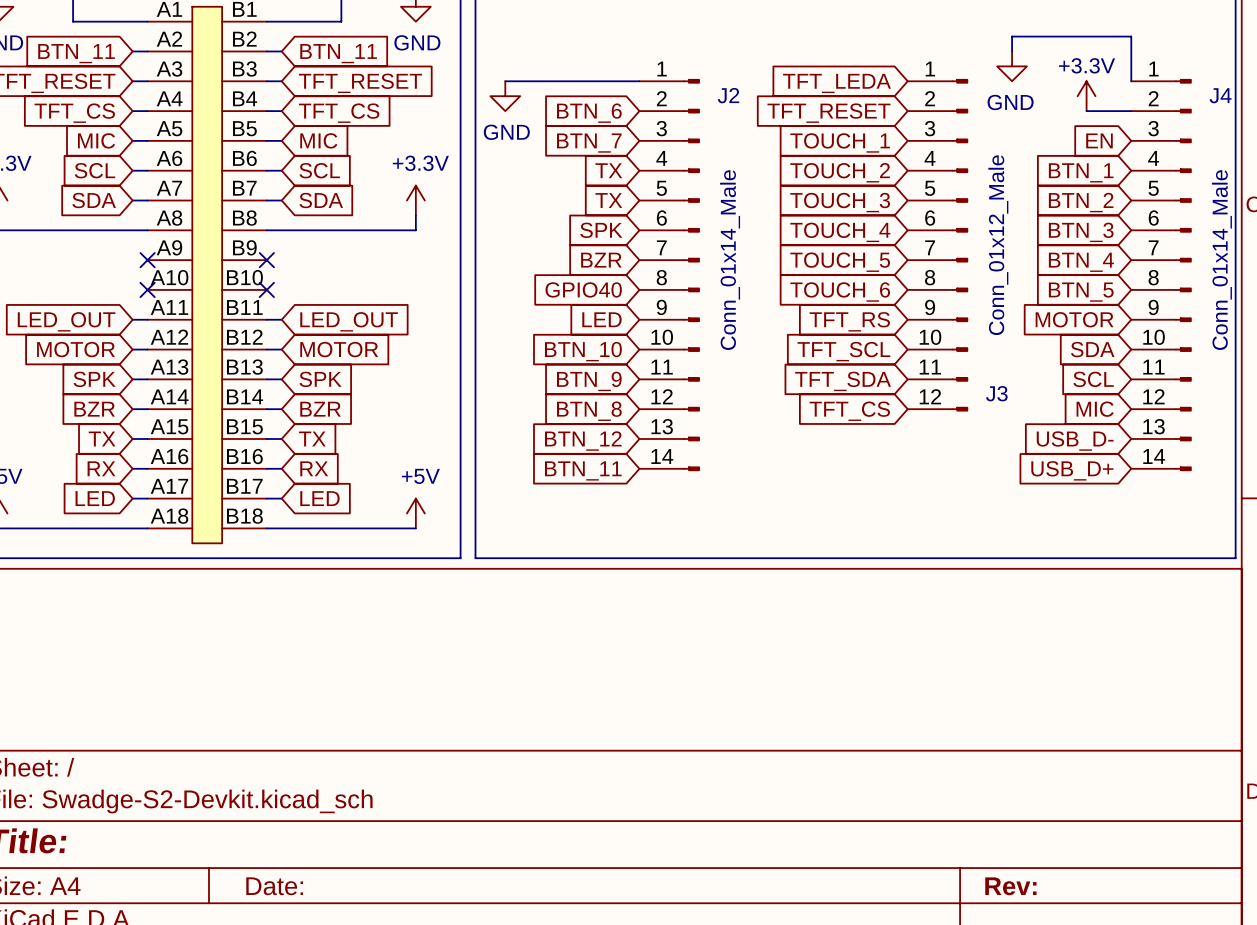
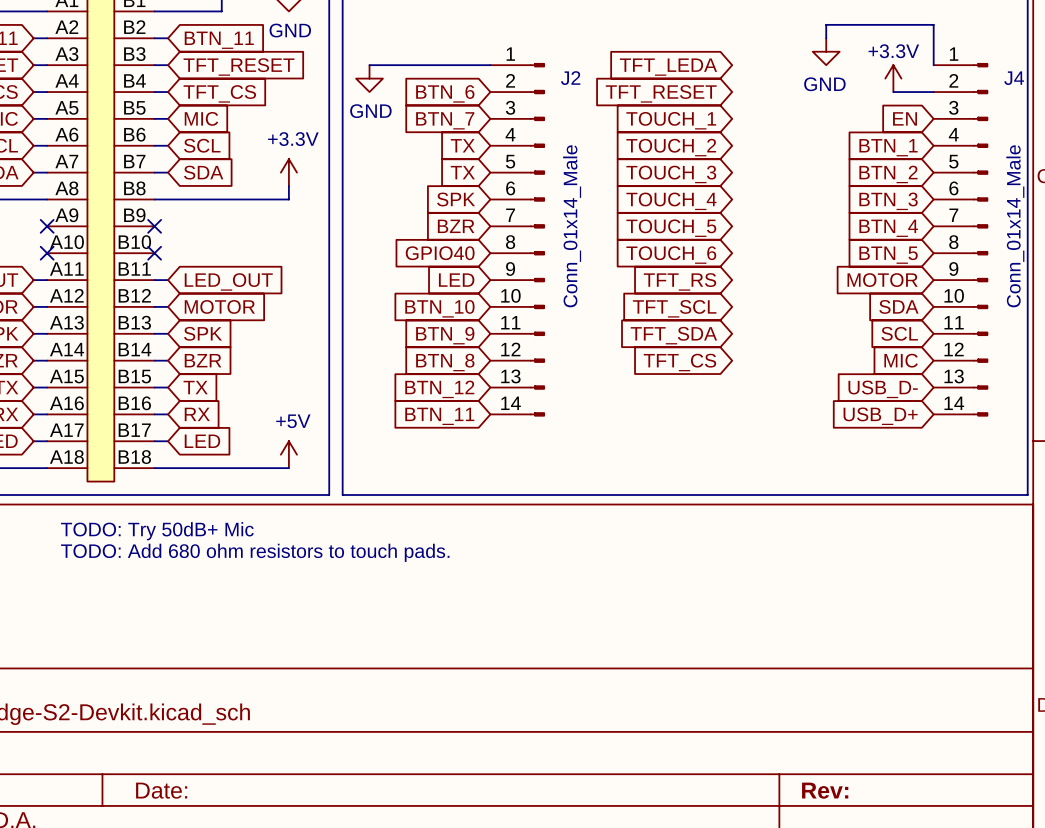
J3: Conn_01x12_Male (937, 245) -> none
text: none -> TODO: Try 50dB+ Mic (157, 531)
text: none -> TODO: Add 680 ohm resistors to touch pads. (255, 552)

